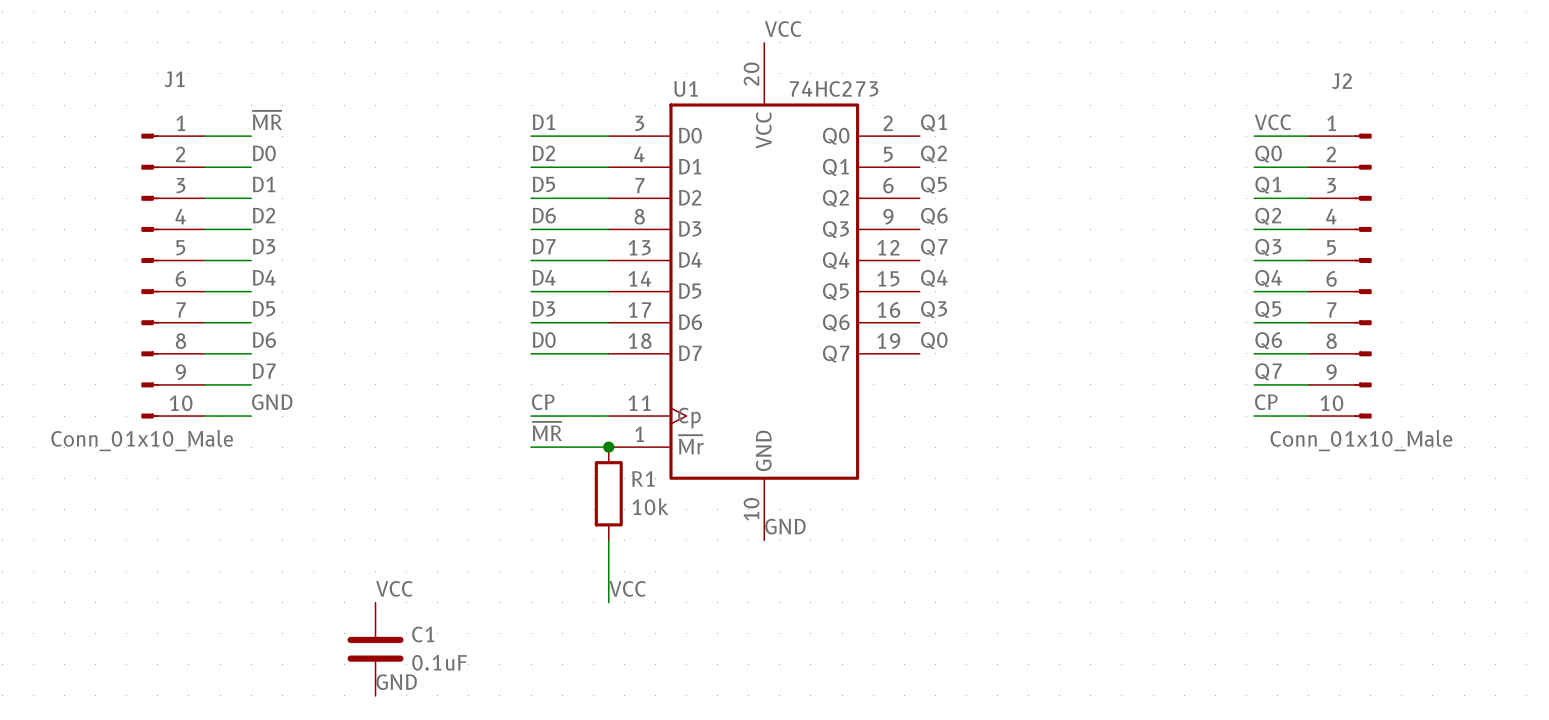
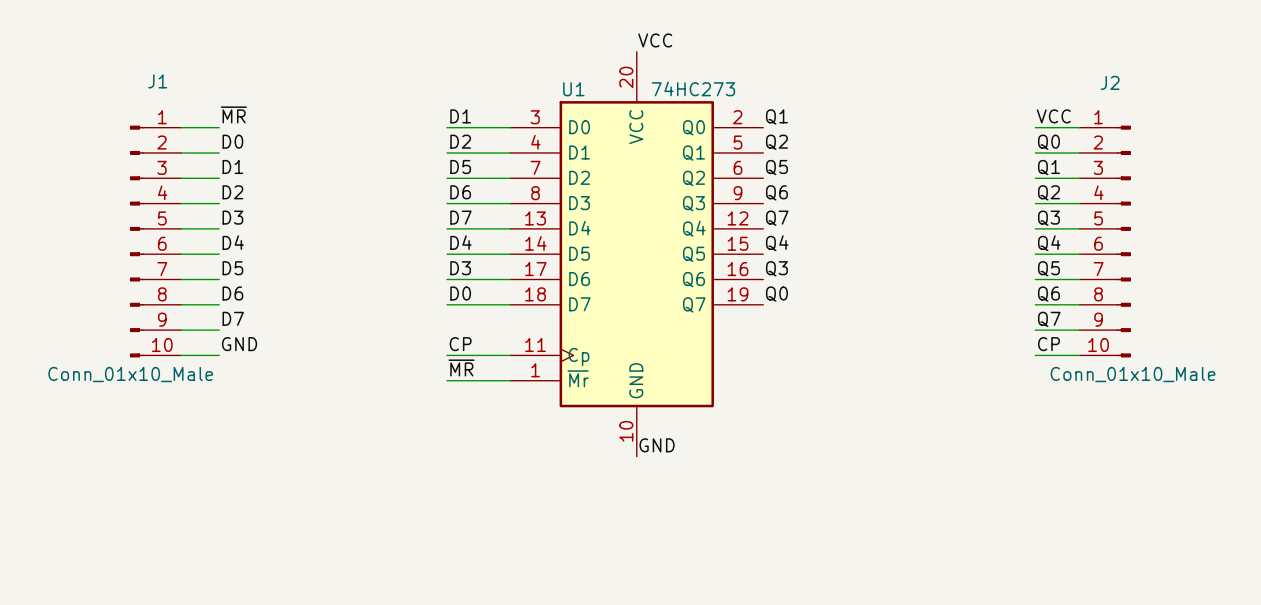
junction: (608, 447) -> none
R1: 10k (608, 493) -> none
wire: (608, 540) (608, 602) -> none
label: VCC (394, 588) -> none
label: VCC (627, 588) -> none
C1: 0.1uF (375, 649) -> none
label: GND (396, 682) -> none

